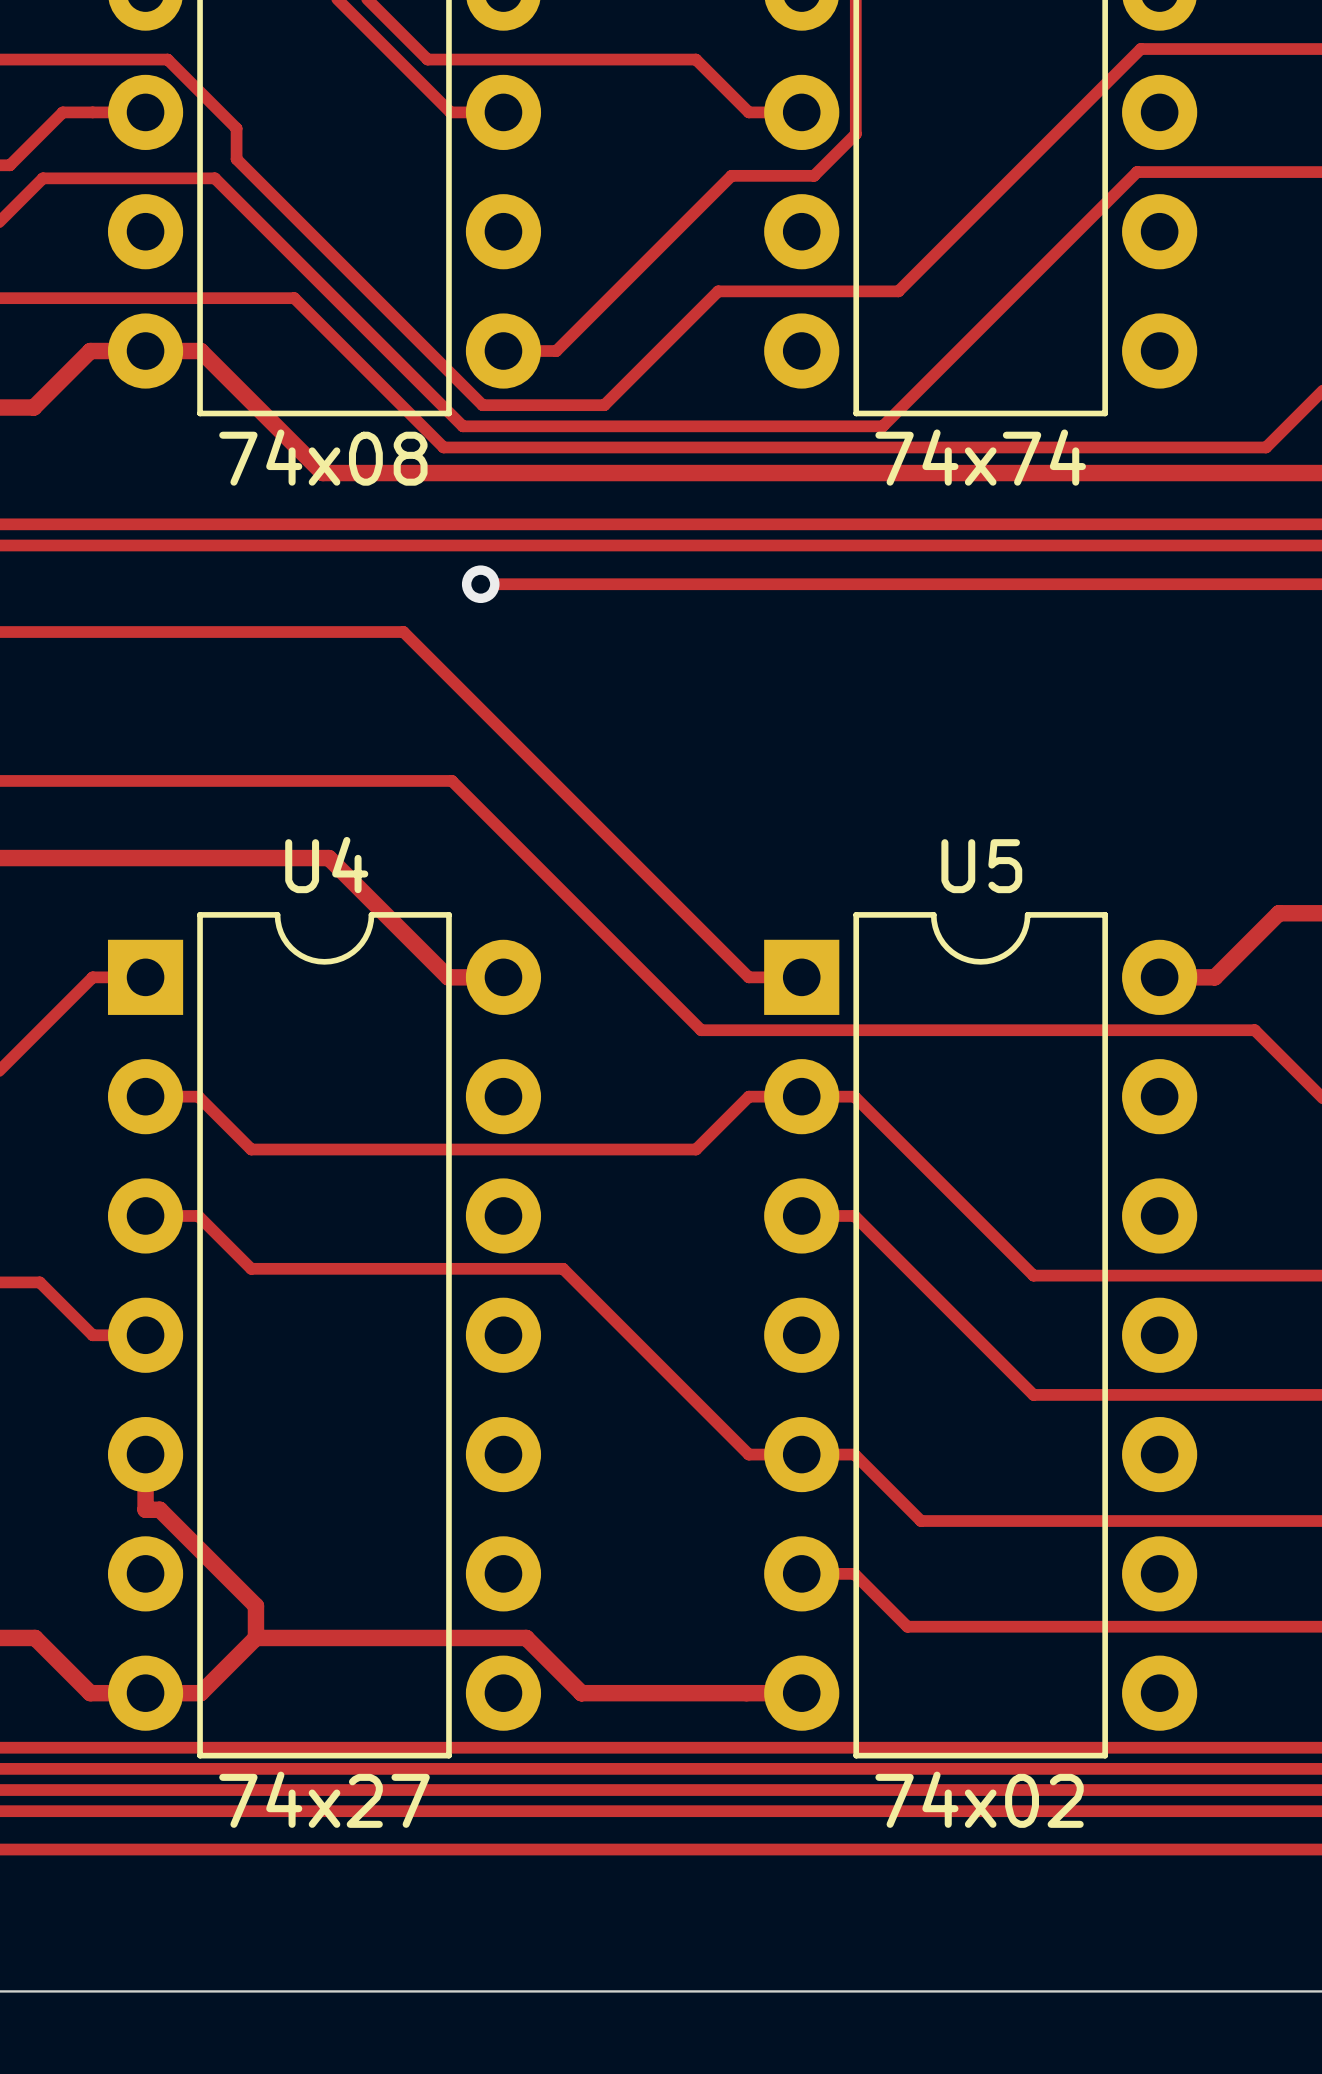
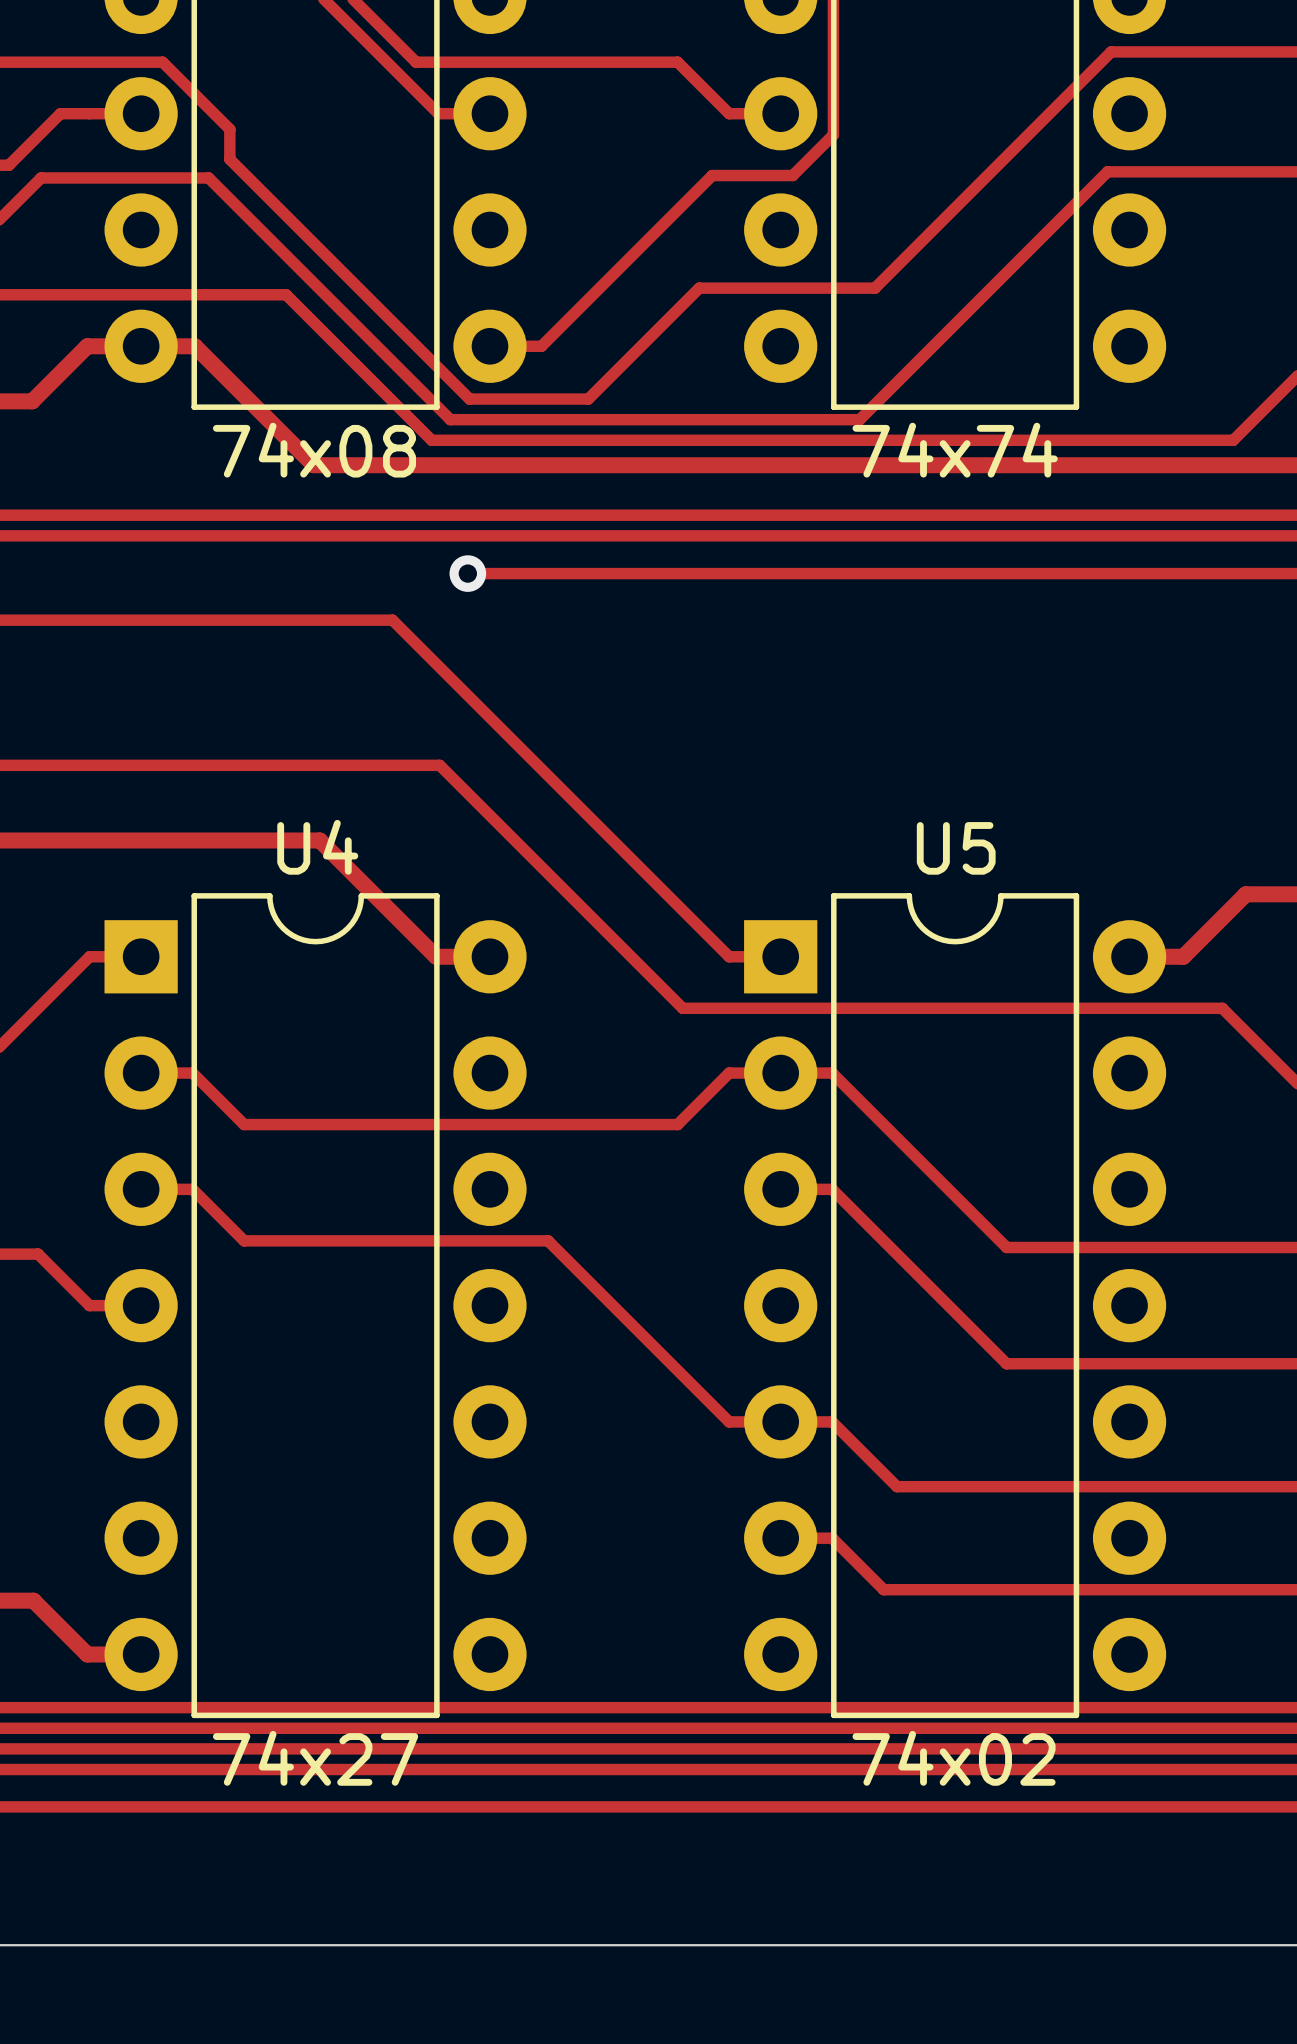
track: (145, 1454) (145, 1509) (159, 1509) (255, 1605) (255, 1637) -> none
track: (255, 1637) (200, 1693) (145, 1693) -> none
track: (255, 1637) (526, 1637) (581, 1693) (801, 1693) -> none

